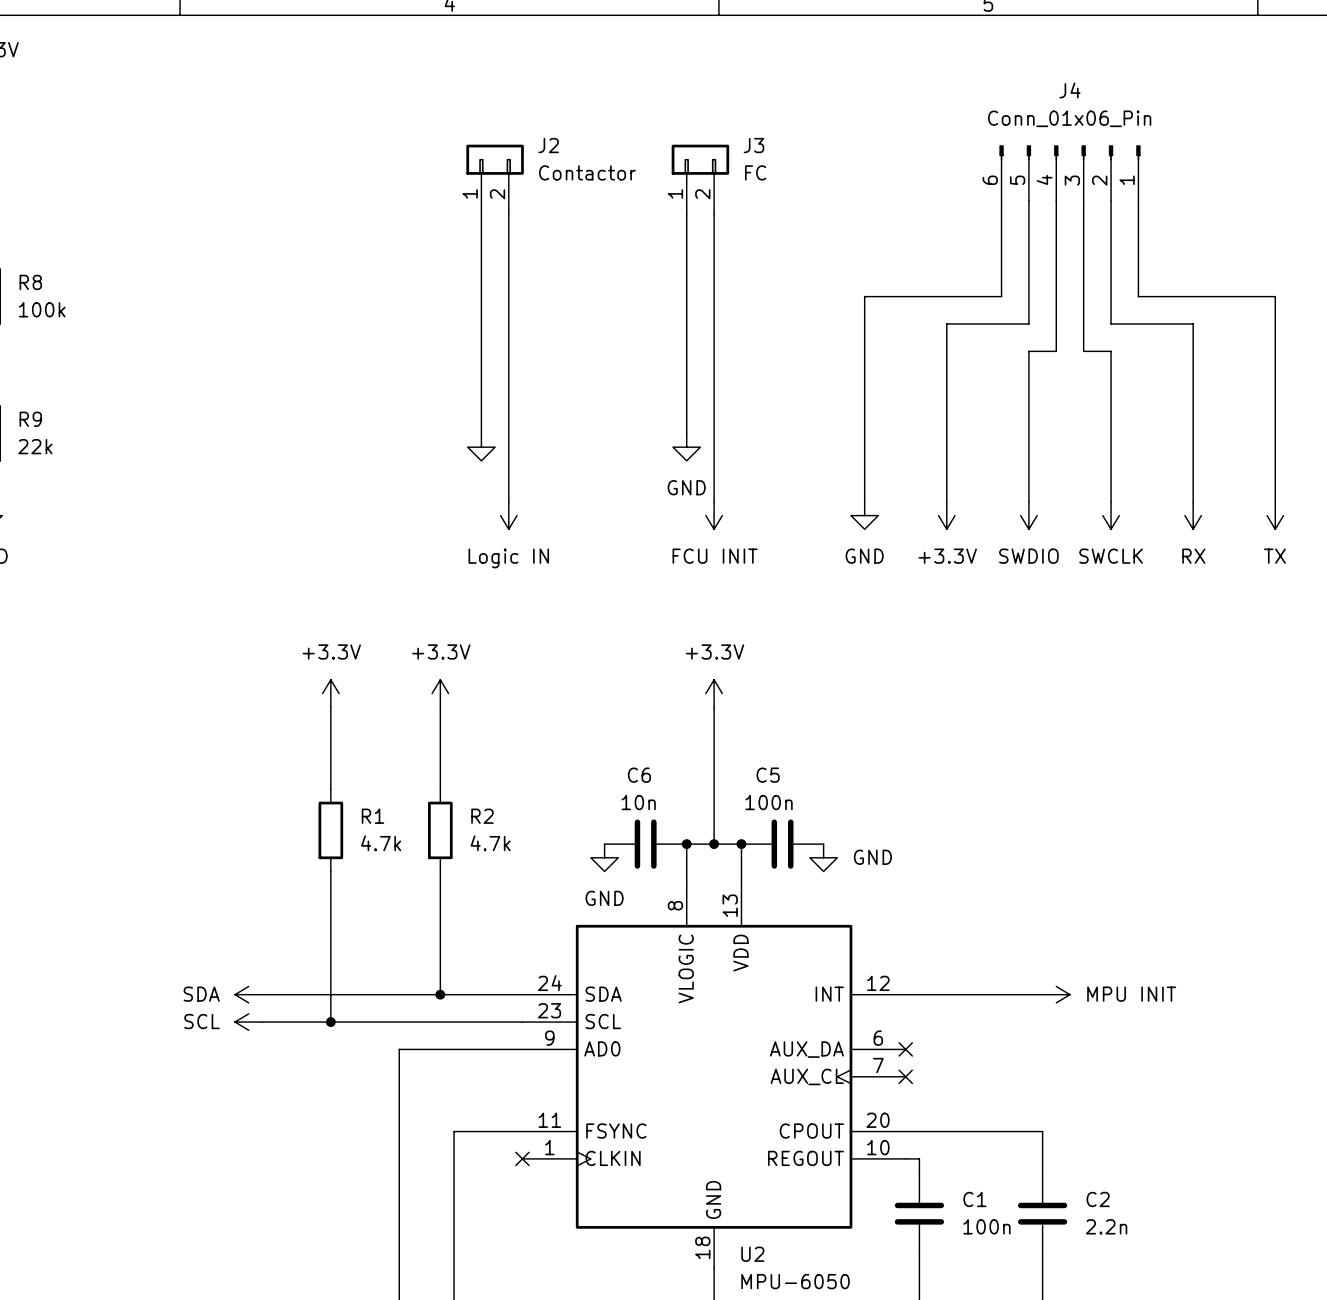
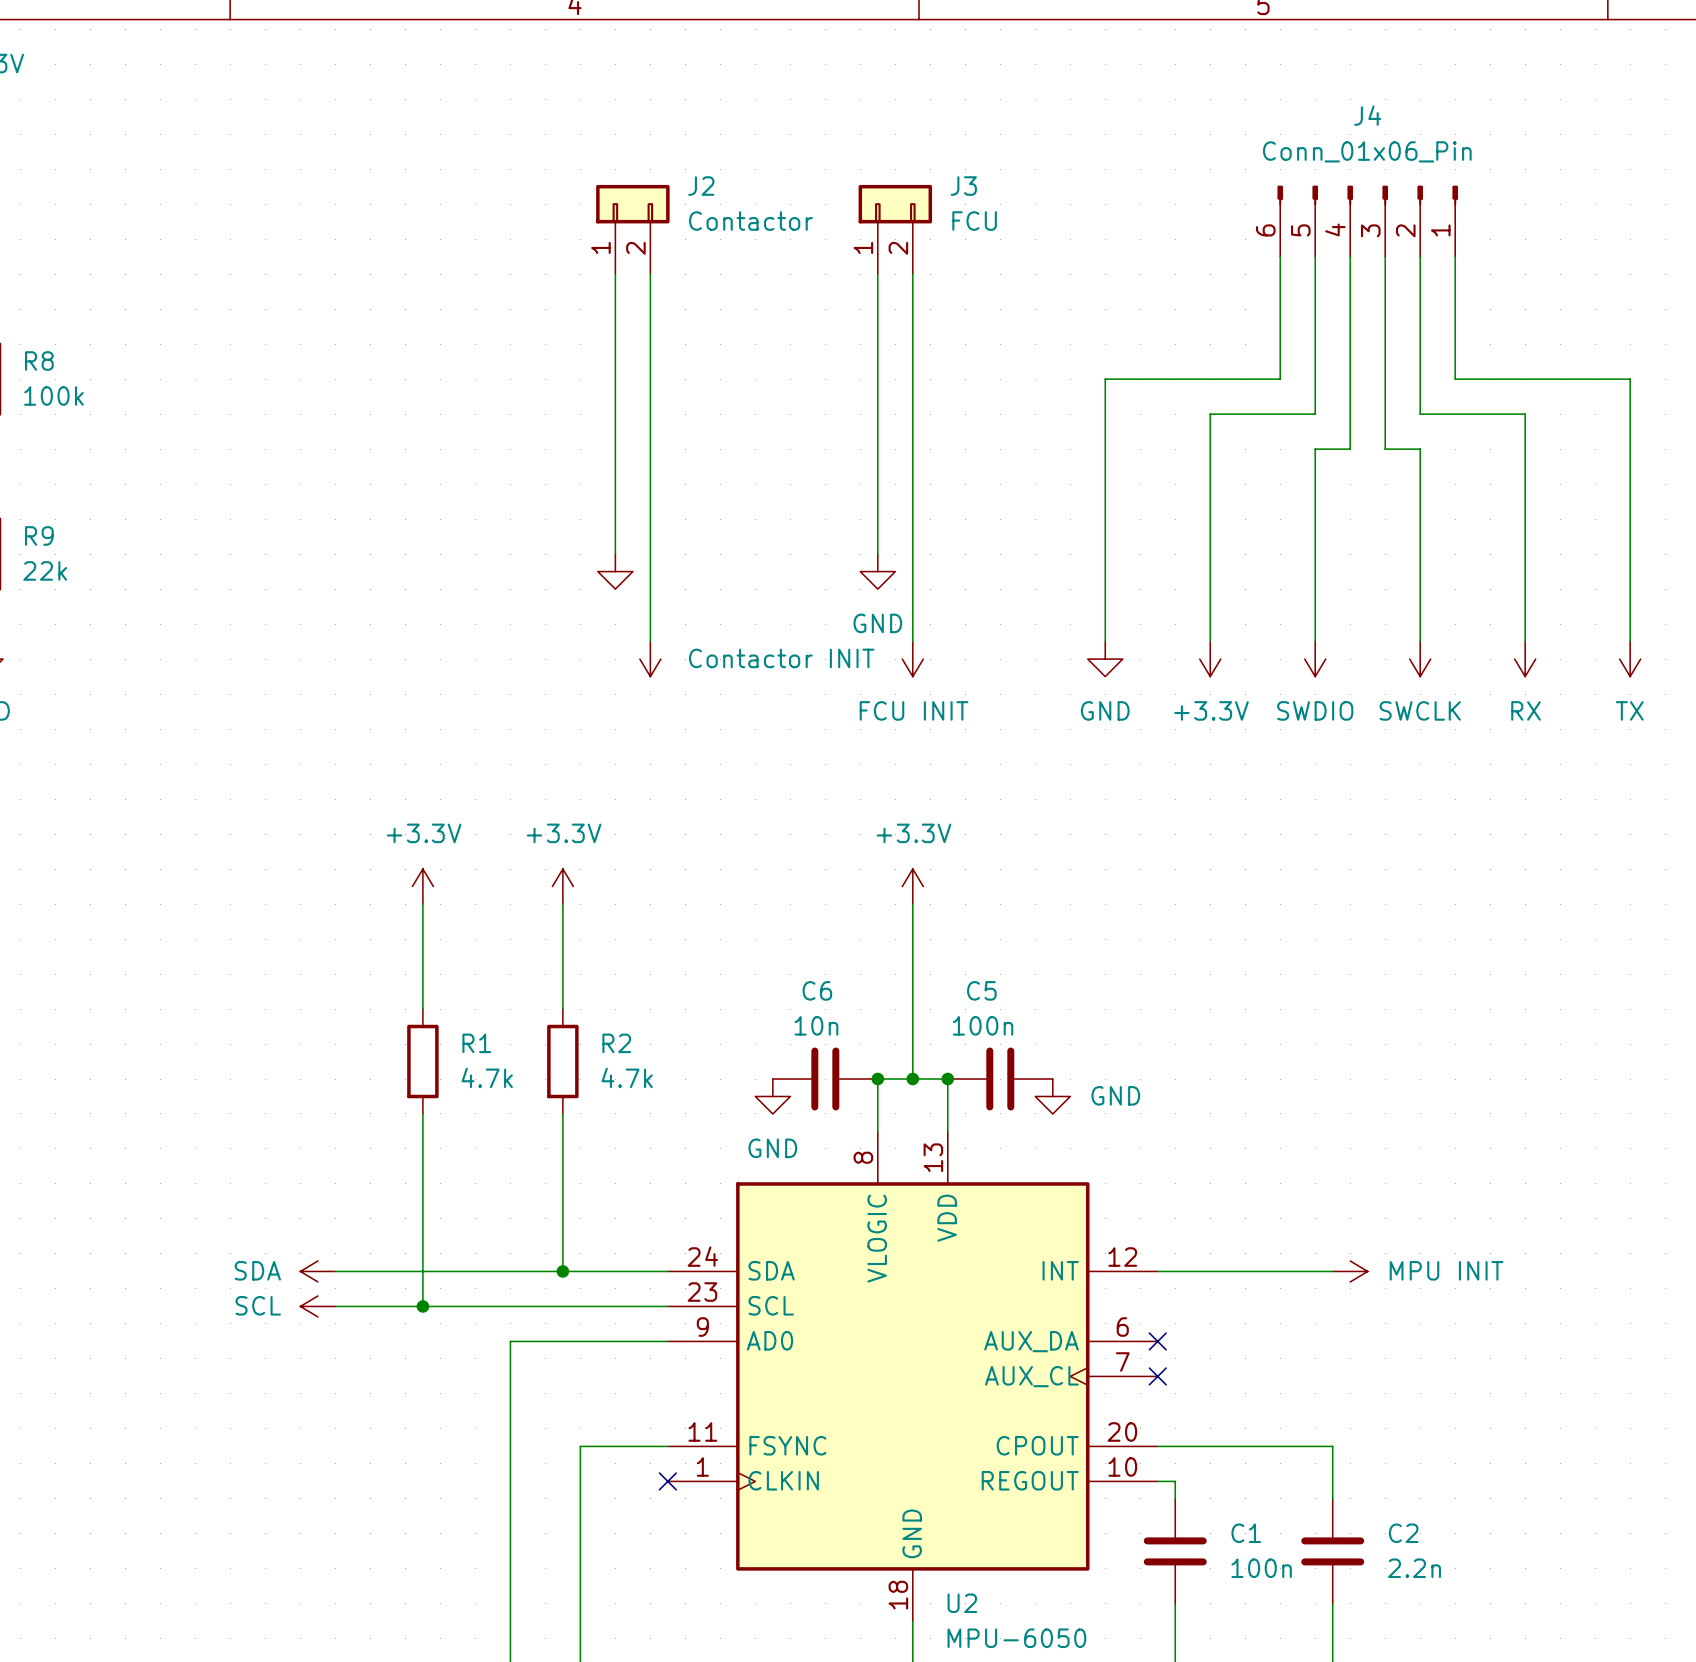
J3 value: FC (755, 172) -> FCU (974, 221)
power symbol: Logic IN (508, 515) -> Contactor INIT (650, 659)

